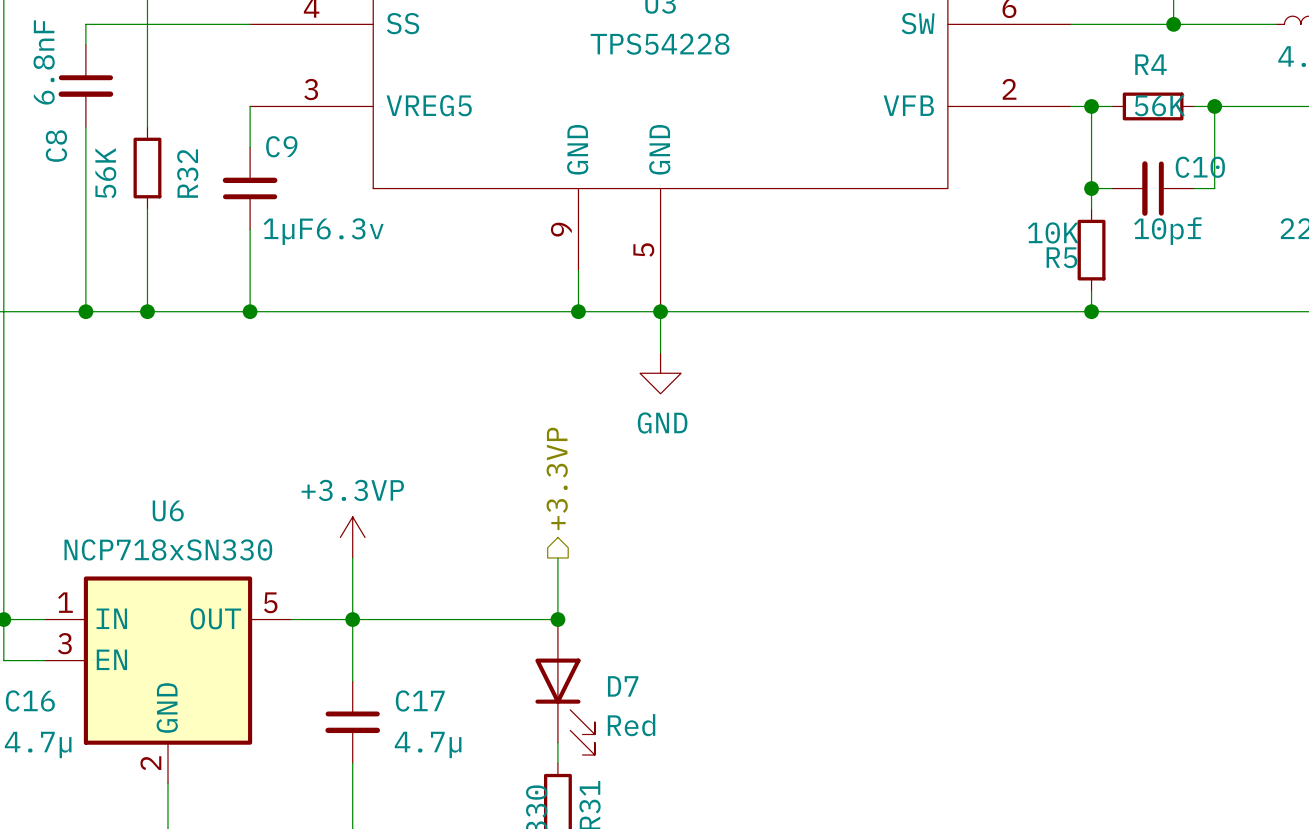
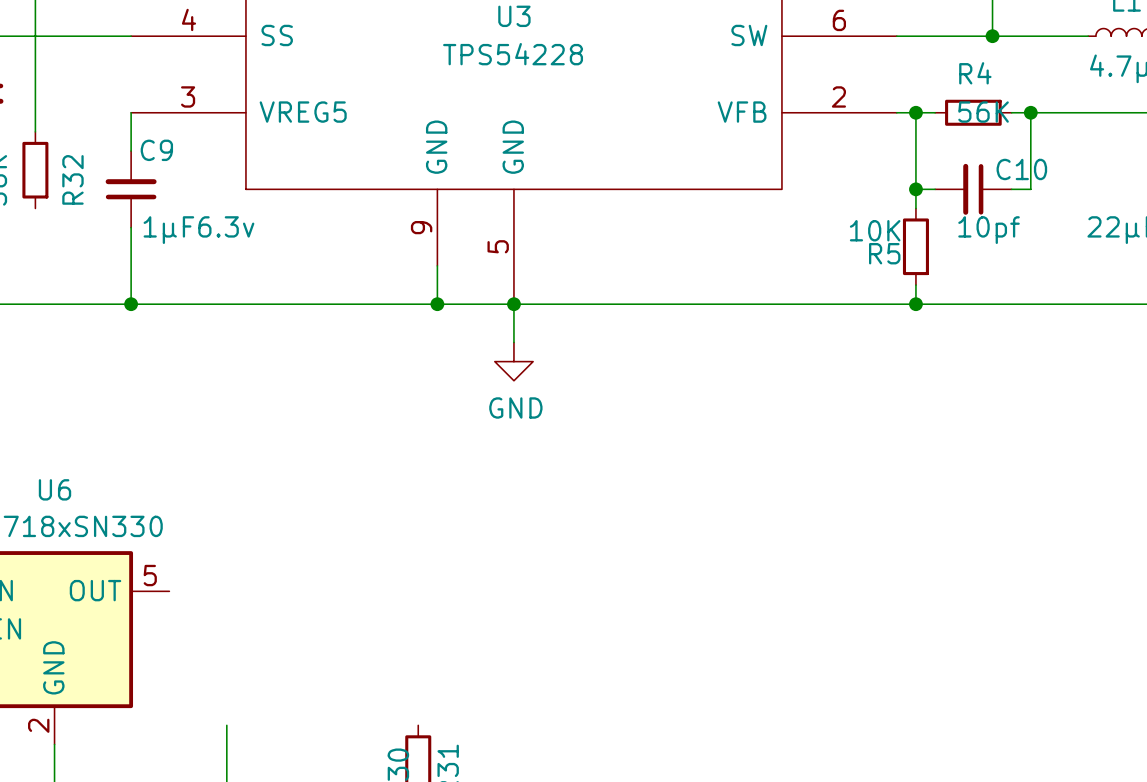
wire: (147, 209) (147, 311) -> none
junction: (147, 311) -> none
hierarchical label: +3.3VP (557, 478) -> none
power symbol: +3.3VP (352, 537) -> none
wire: (352, 557) (352, 681) -> none
wire: (557, 557) (557, 619) (291, 619) -> none
junction: (352, 619) -> none
junction: (557, 619) -> none
D7: Red (565, 687) -> none
C17: 4.7µ (352, 722) -> none
wire: (557, 742) (557, 763) -> none

